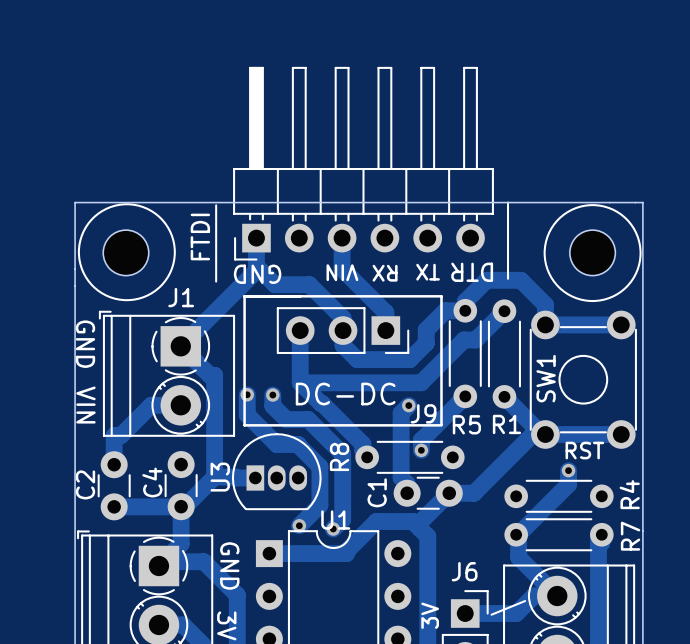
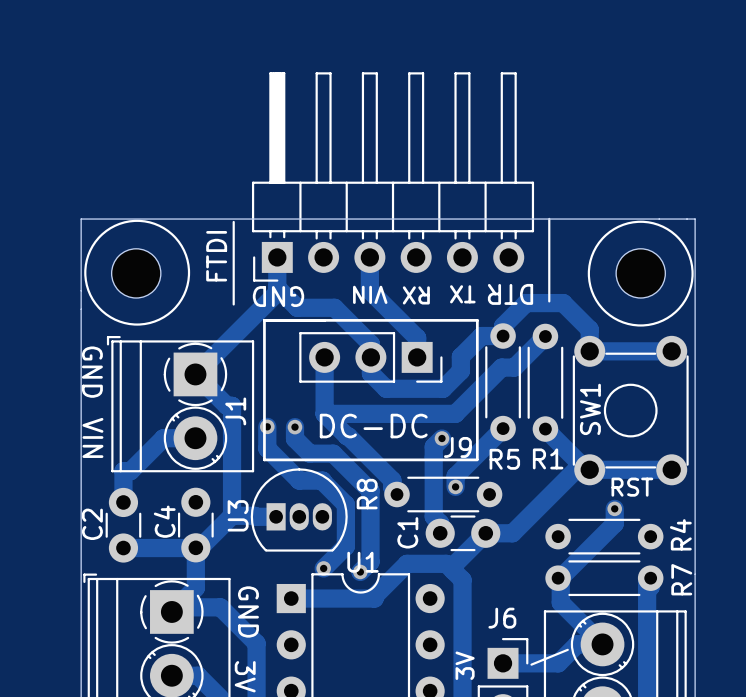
J1 name rotation: 0° (181, 297) -> 90° counterclockwise (235, 411)
J1 name position: J1 (181, 297) -> J1 (235, 411)

